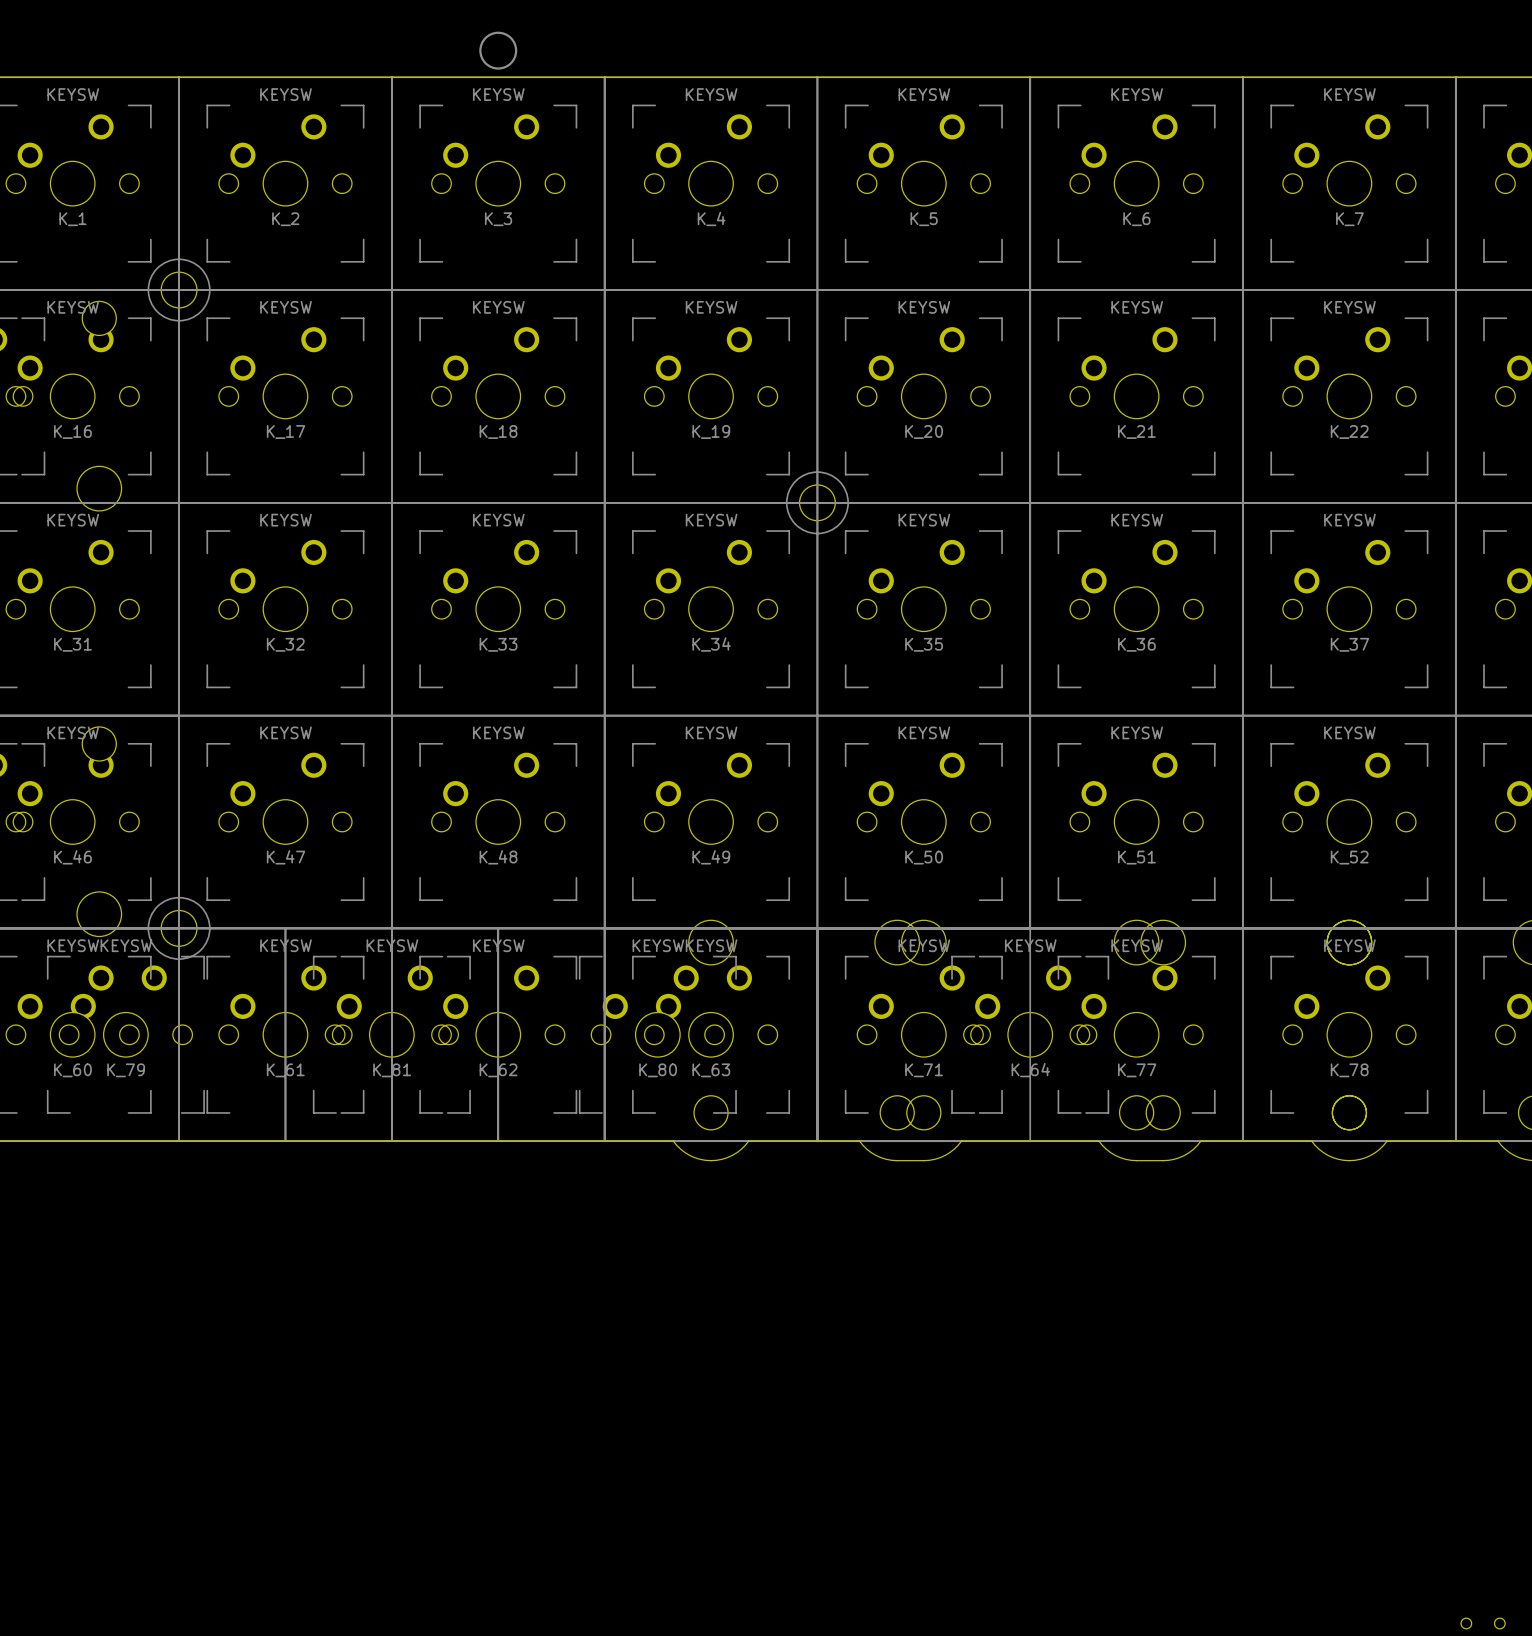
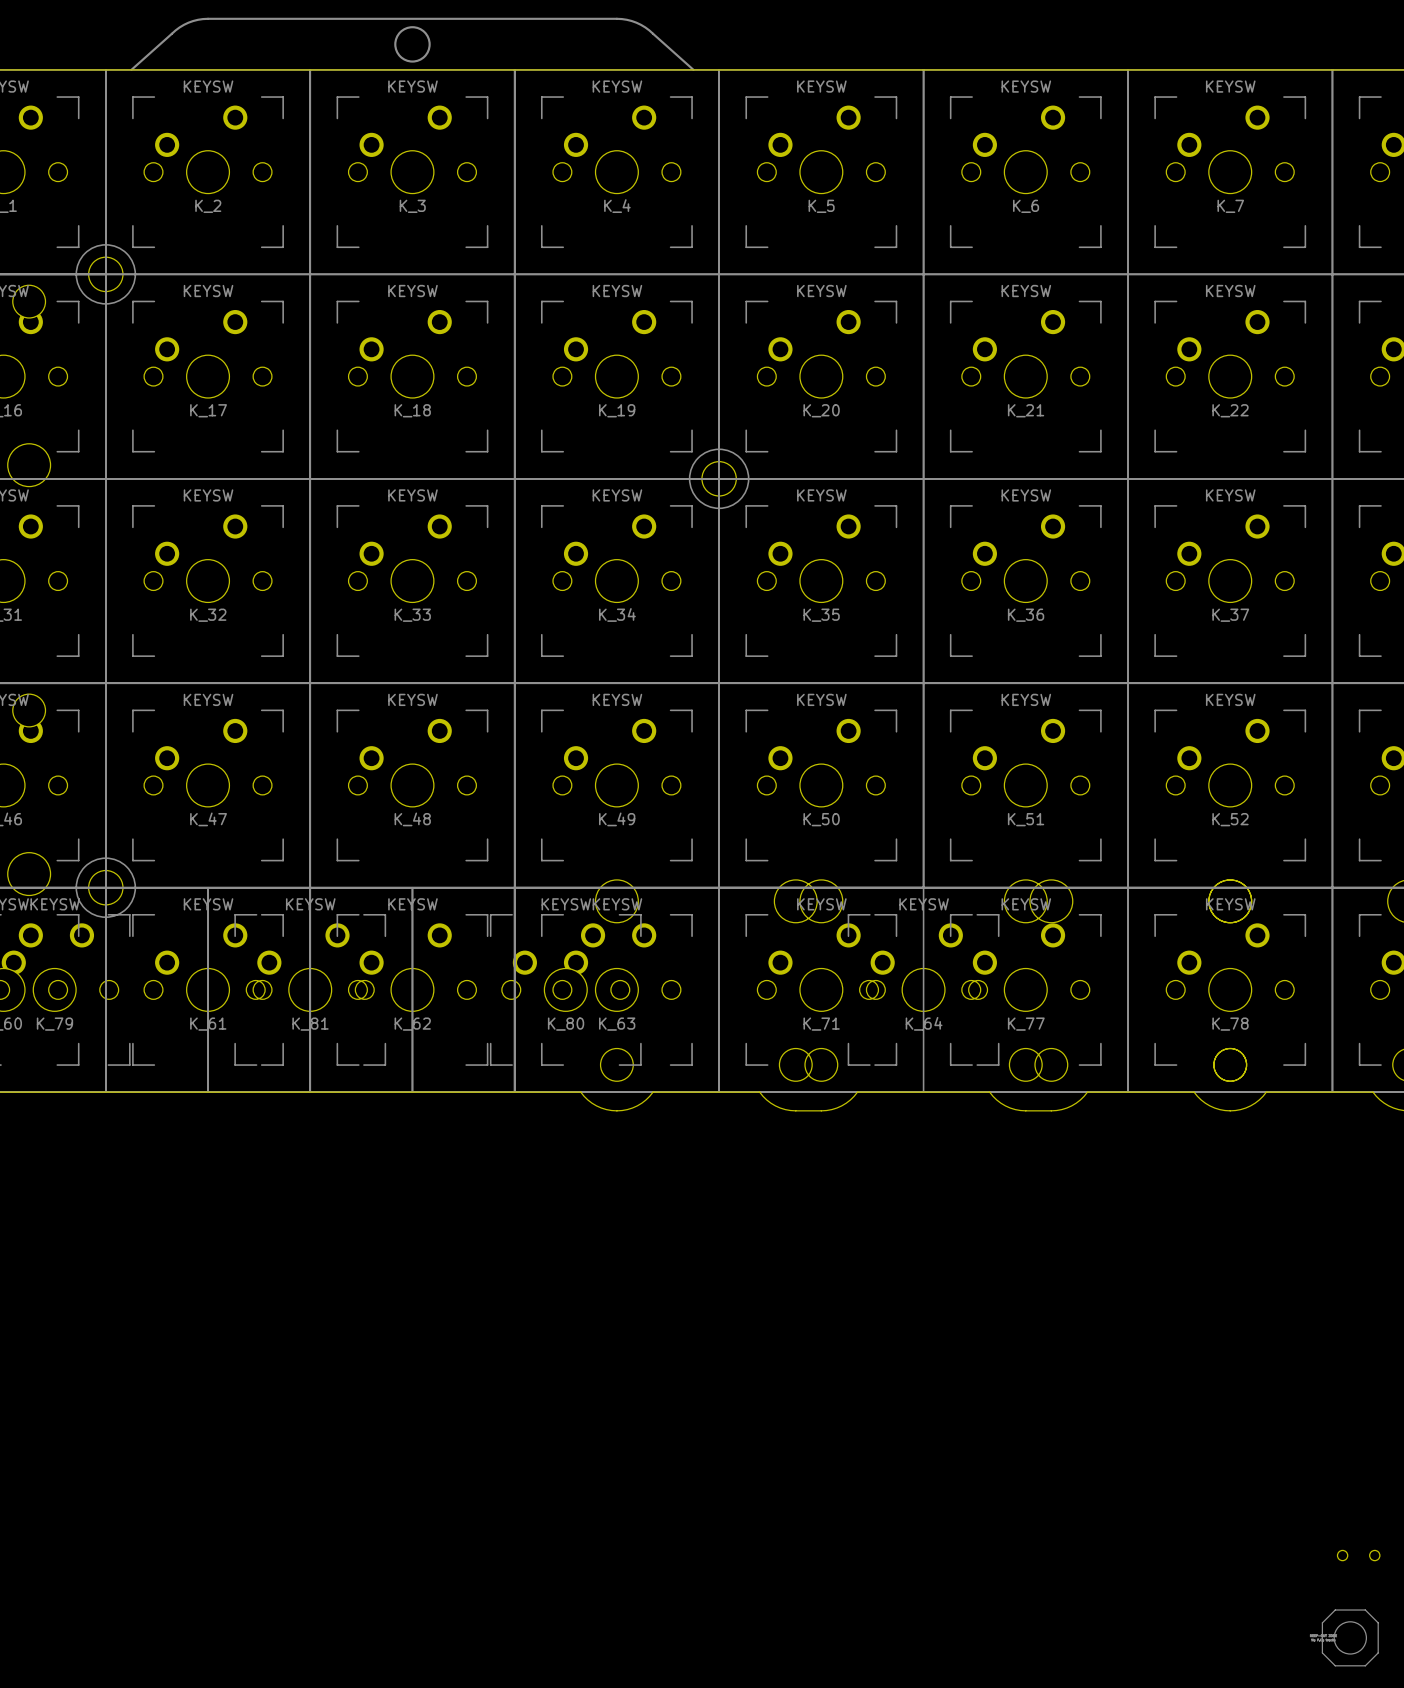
line: none -> (131, 69) (179, 27) (193, 21) (208, 18) (621, 19) (645, 27) (693, 69)

